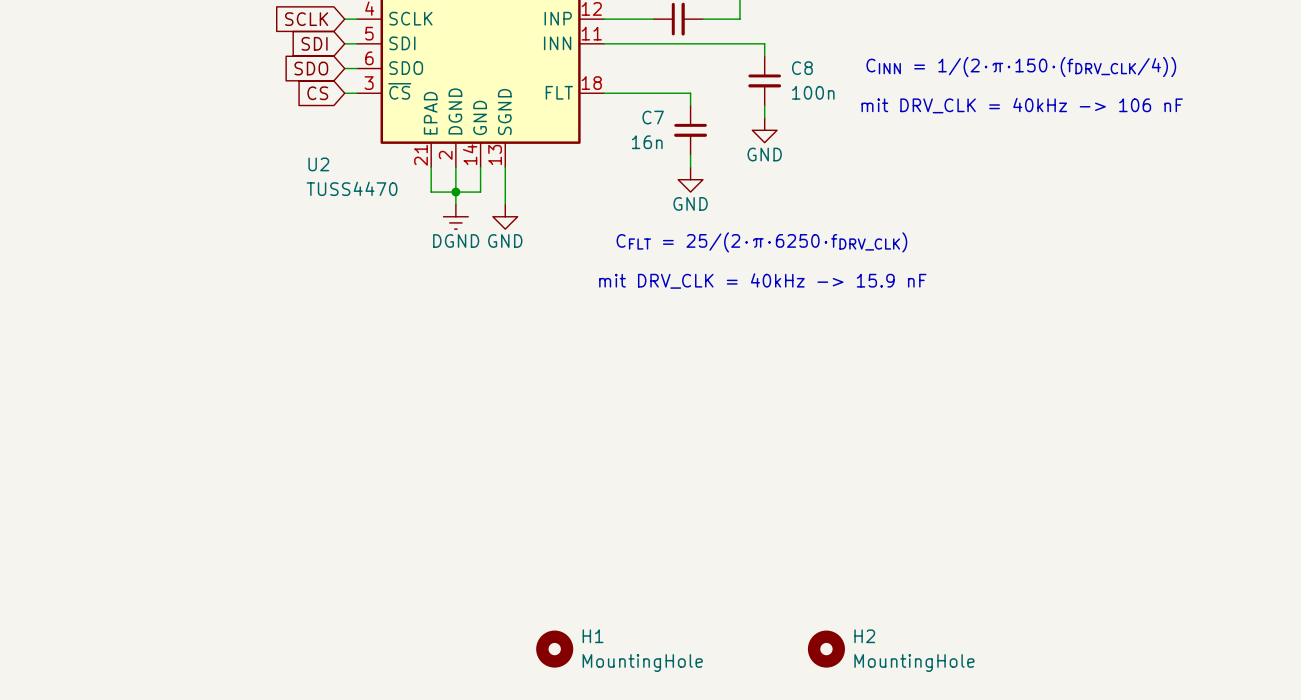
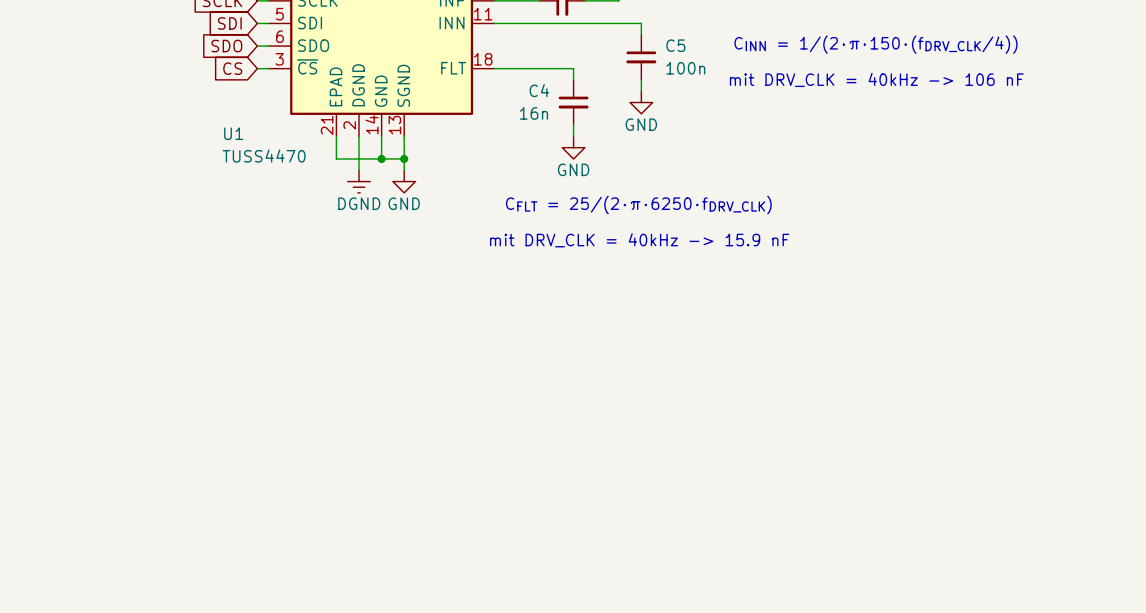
C8 name: C8 (802, 68) -> C5 (675, 45)
C7 name: C7 (653, 117) -> C4 (539, 90)
U2 name: U2 (318, 164) -> U1 (233, 133)
junction: (455, 192) -> none
wire: none -> (381, 158) (404, 158)
junction: none -> (381, 158)
junction: none -> (404, 158)
H1: MountingHole (554, 649) -> none
H2: MountingHole (826, 649) -> none

